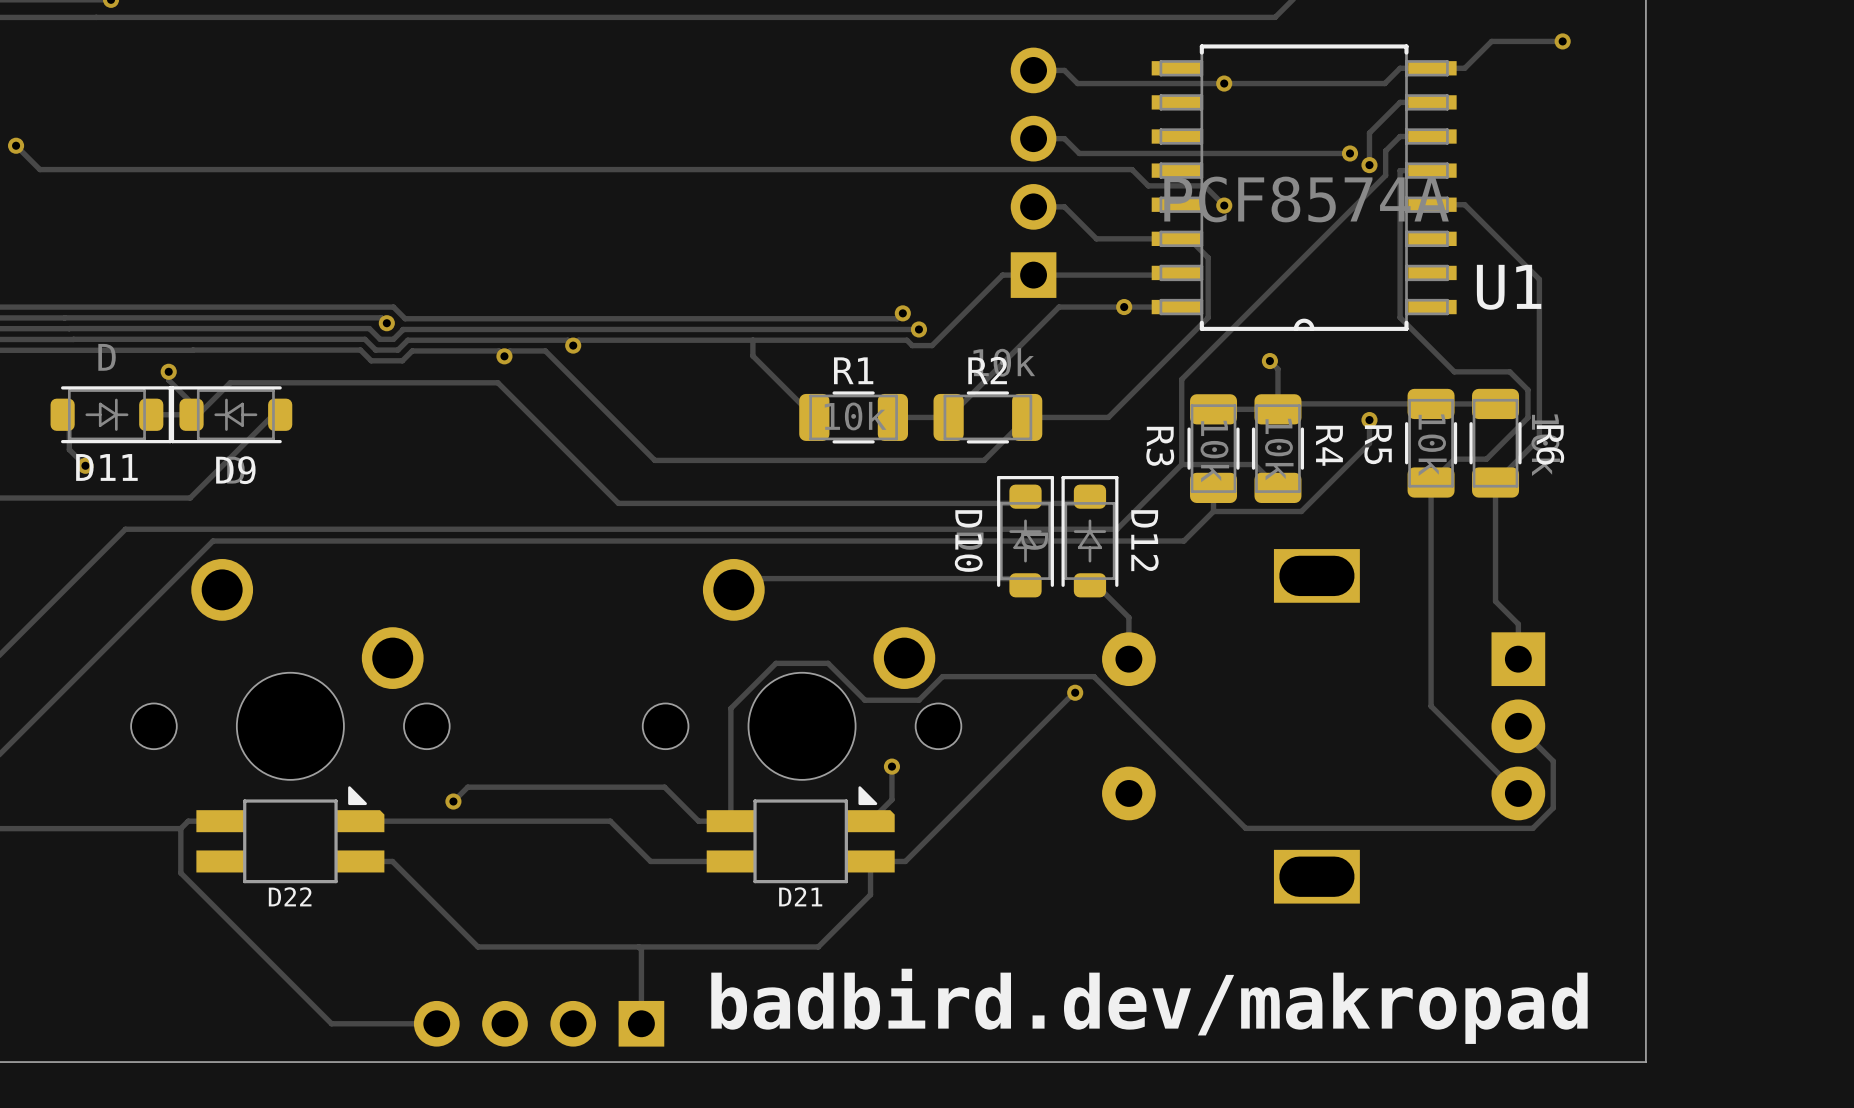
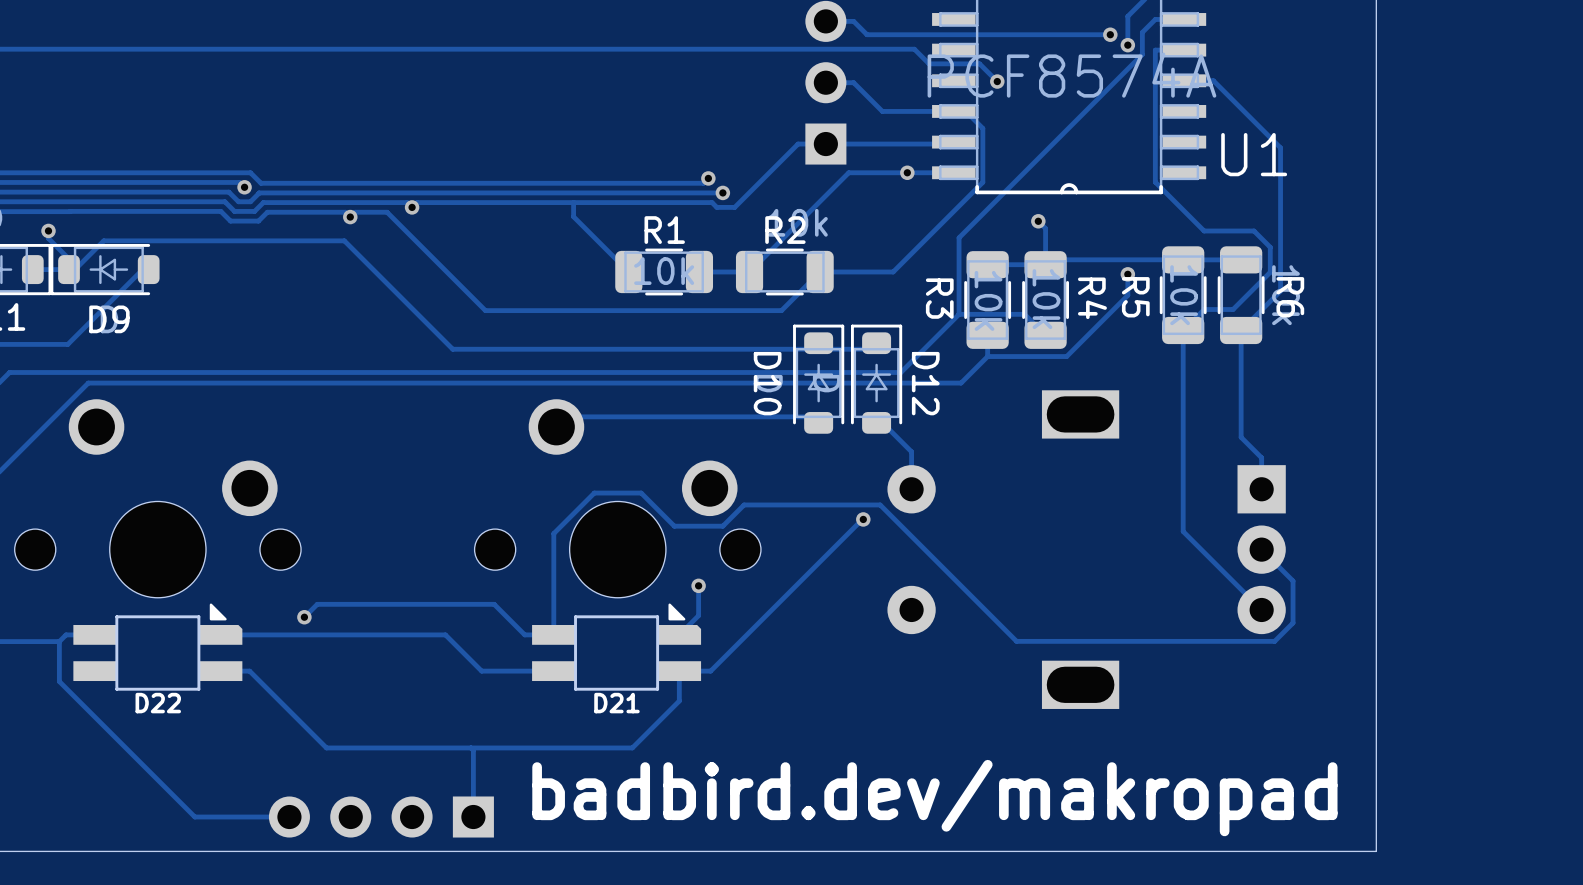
text position: badbird.dev/makropad (1149, 1006) -> badbird.dev/makropad (934, 798)

